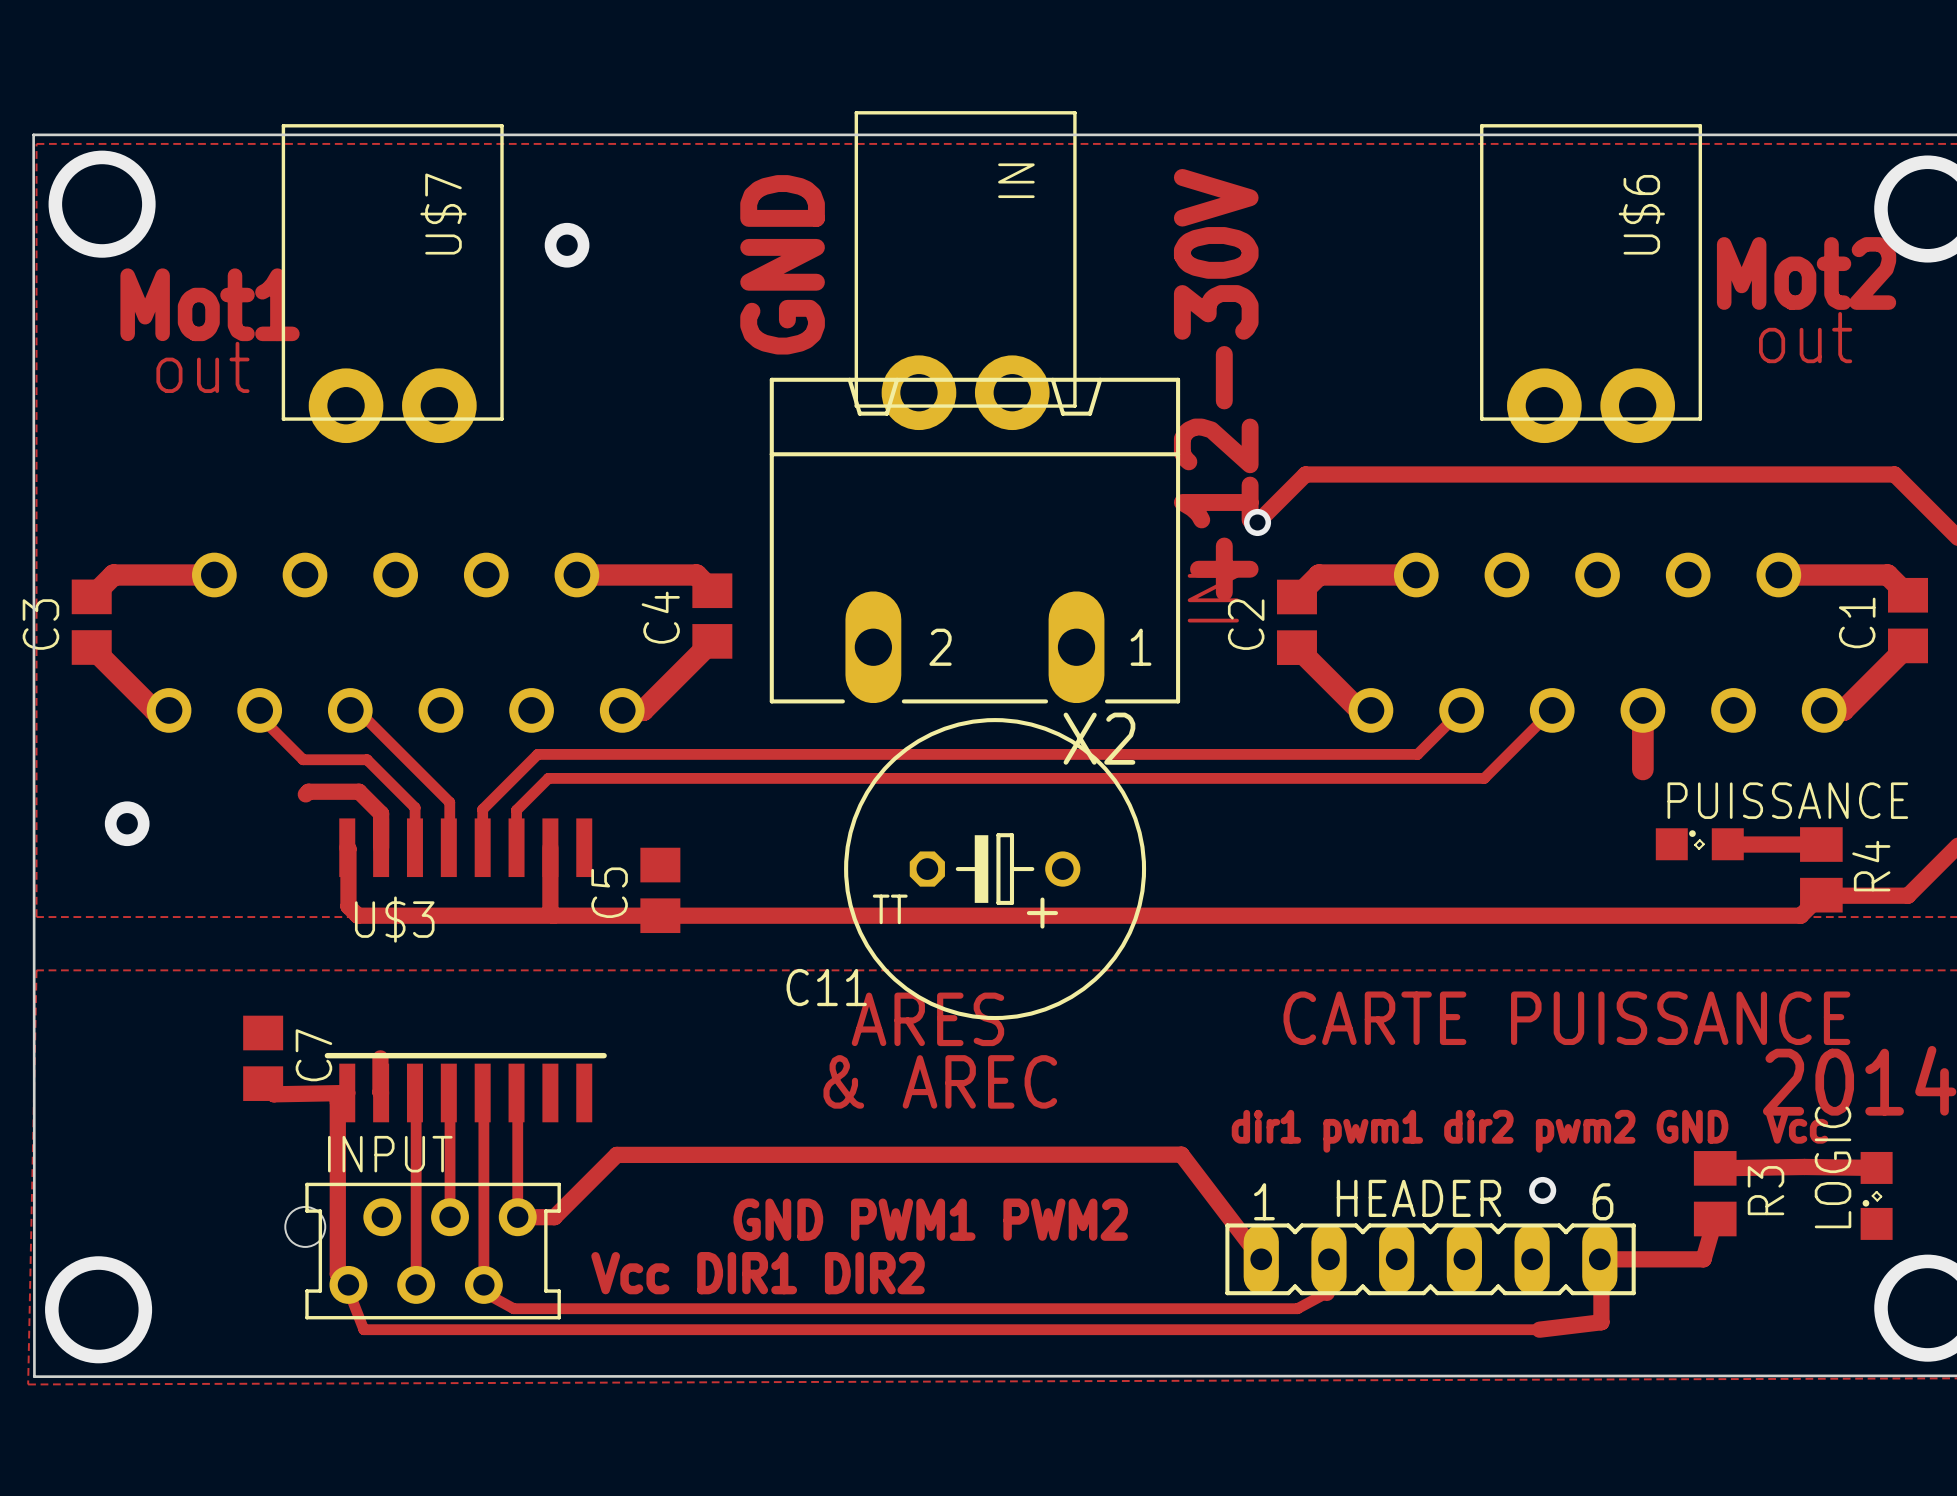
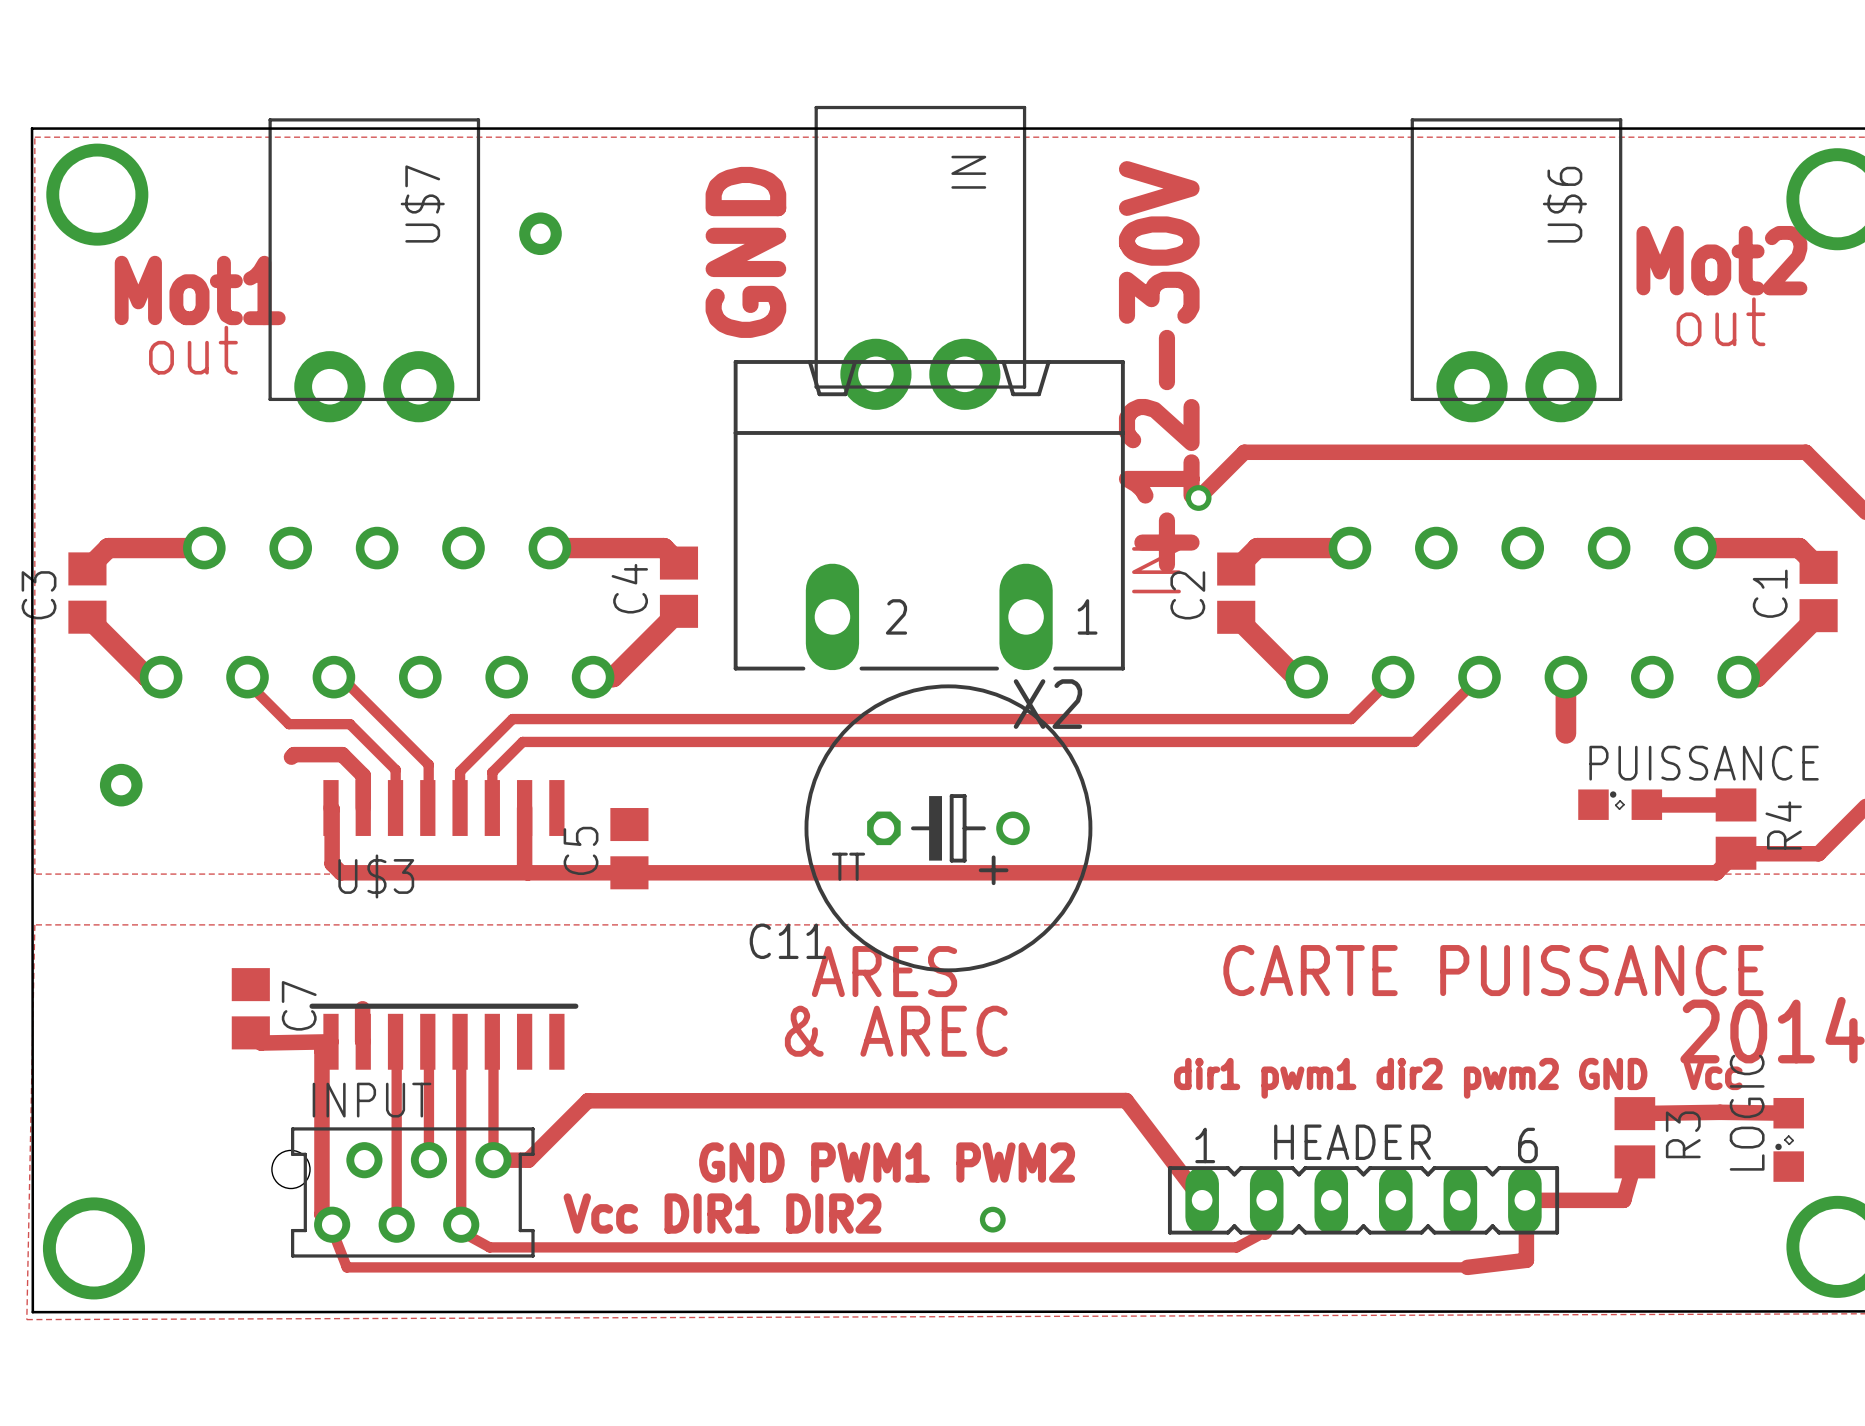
via: (1542, 1190) -> none
via: none -> (992, 1219)

